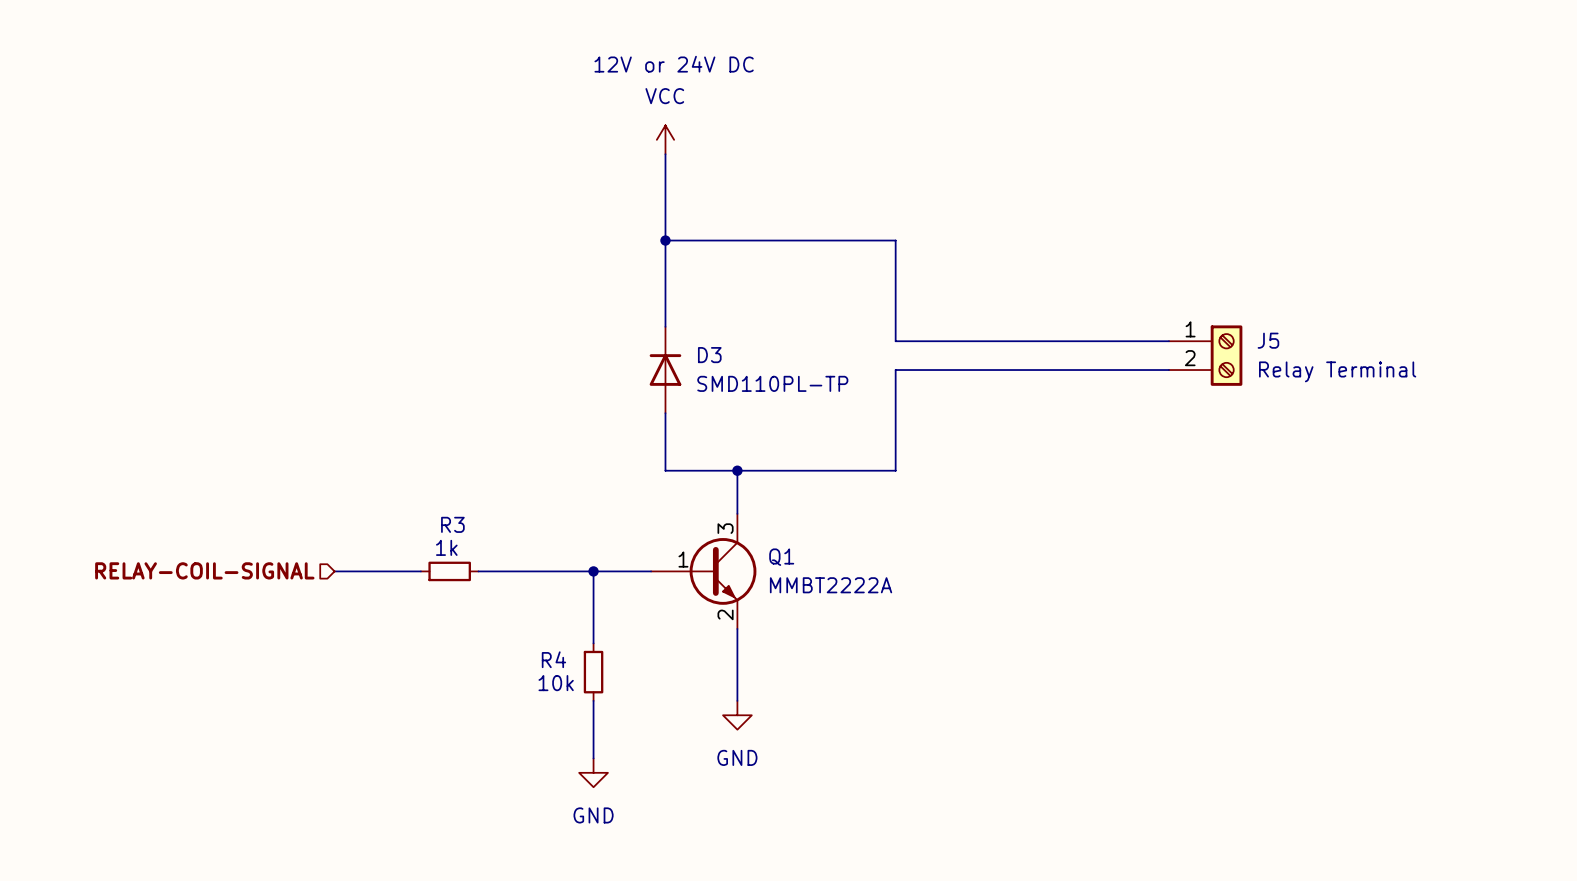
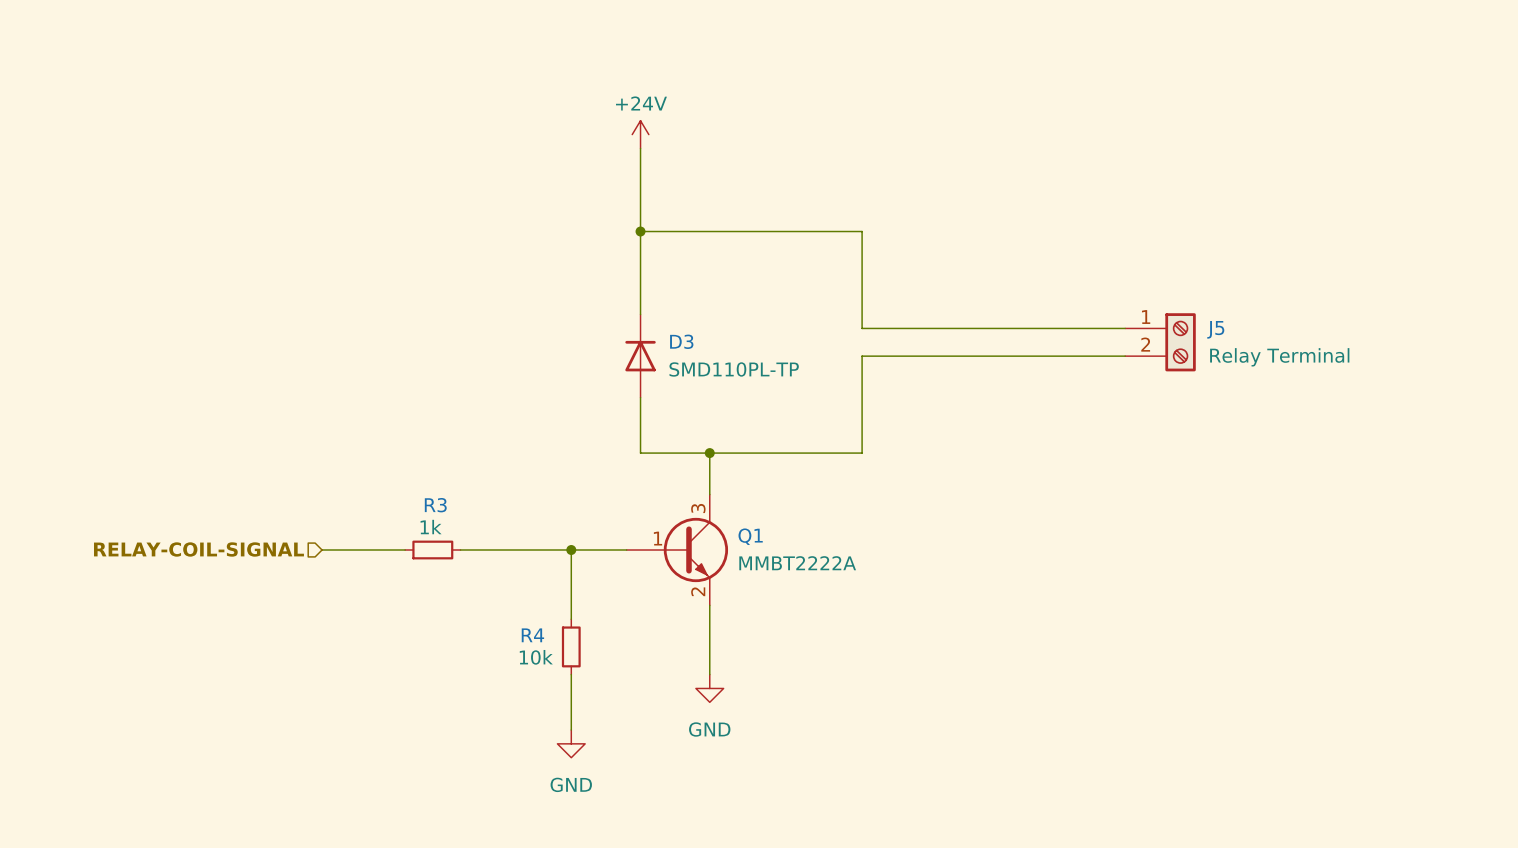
text: 12V or 24V DC (674, 64) -> none
power symbol: VCC (665, 139) -> +24V (640, 134)

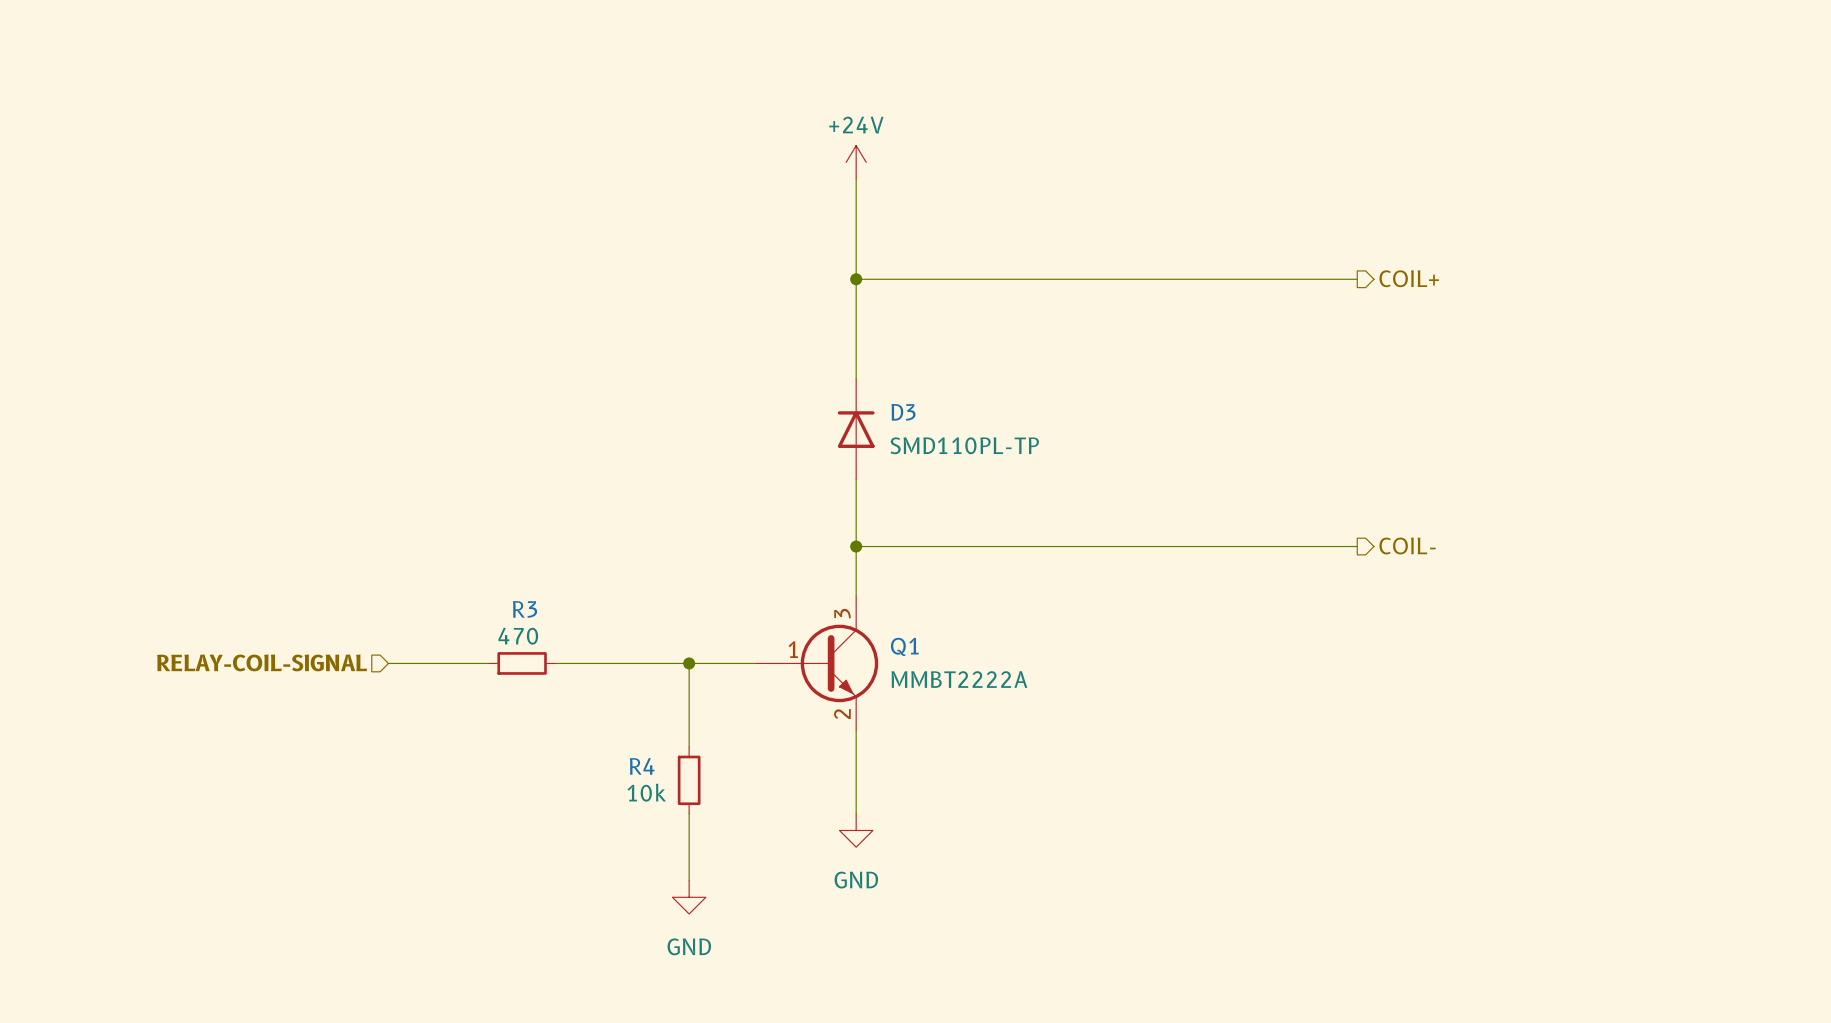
power symbol position: +24V (640, 134) -> +24V (856, 162)
wire: (640, 148) (640, 314) -> (856, 179) (856, 379)
wire: (640, 231) (709, 231) -> none
junction: (640, 231) -> none
junction: none -> (856, 279)
wire: (862, 231) (862, 328) (1125, 328) -> (1039, 279) (1357, 279)
hierarchical label: none -> COIL+ (1409, 278)
J5: Relay Terminal (1160, 342) -> none
D3 position: (640, 356) -> (856, 429)
wire: (1125, 356) (862, 356) (862, 453) -> (1357, 546) (1039, 546)
wire: (640, 397) (640, 453) (709, 453) -> (856, 479) (856, 546)
hierarchical label: none -> COIL- (1407, 545)
R3 value: 1k (431, 527) -> 470 (518, 636)

